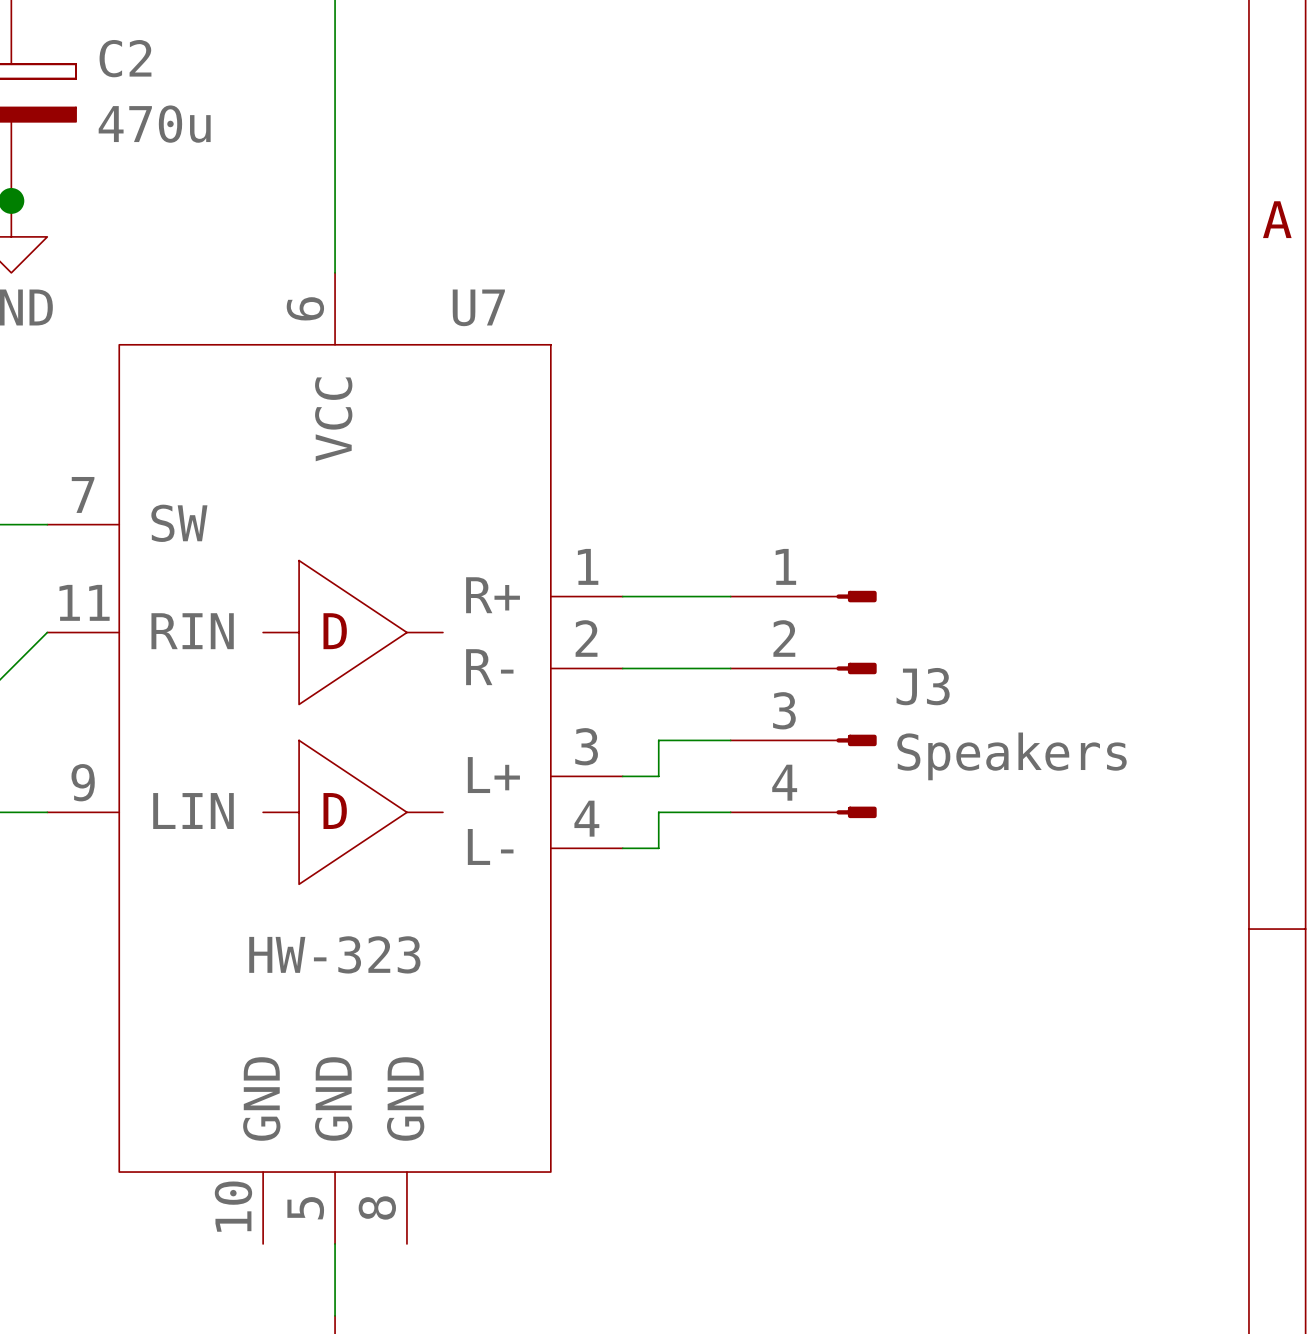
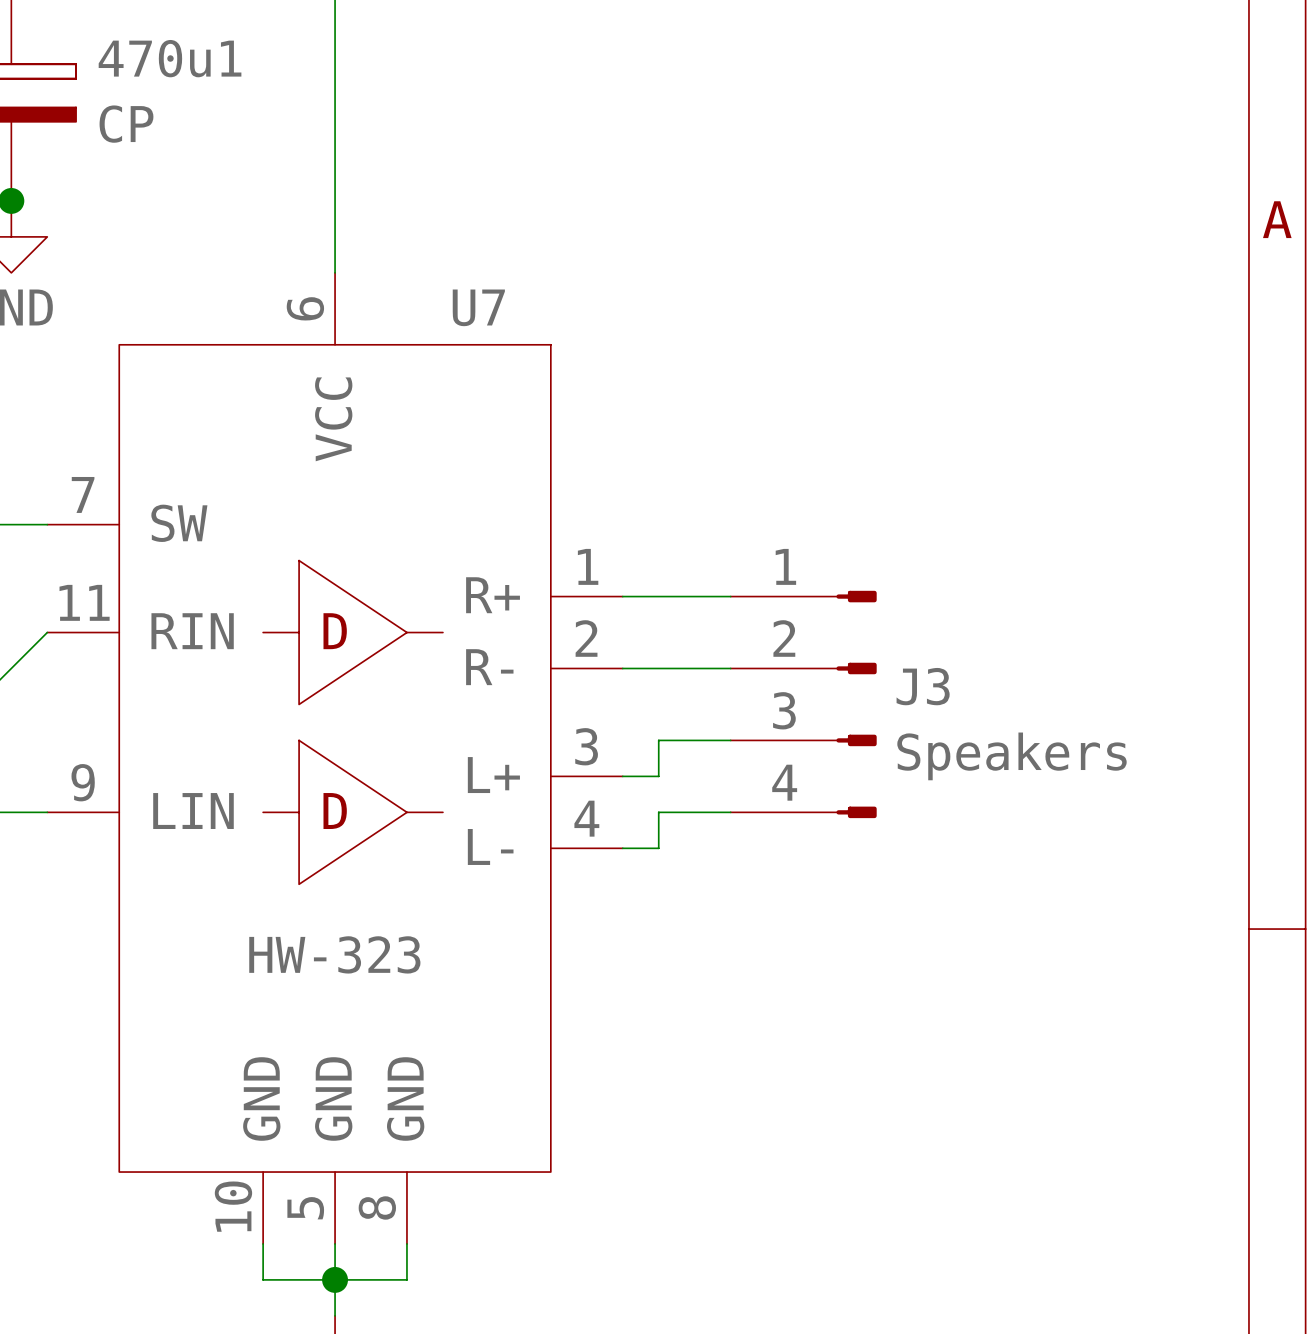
C2 name: C2 (125, 58) -> 470u1 (170, 58)
C2 value: 470u (154, 124) -> CP (126, 124)
wire: none -> (263, 1243) (263, 1279) (406, 1279) (406, 1243)
junction: none -> (335, 1279)

